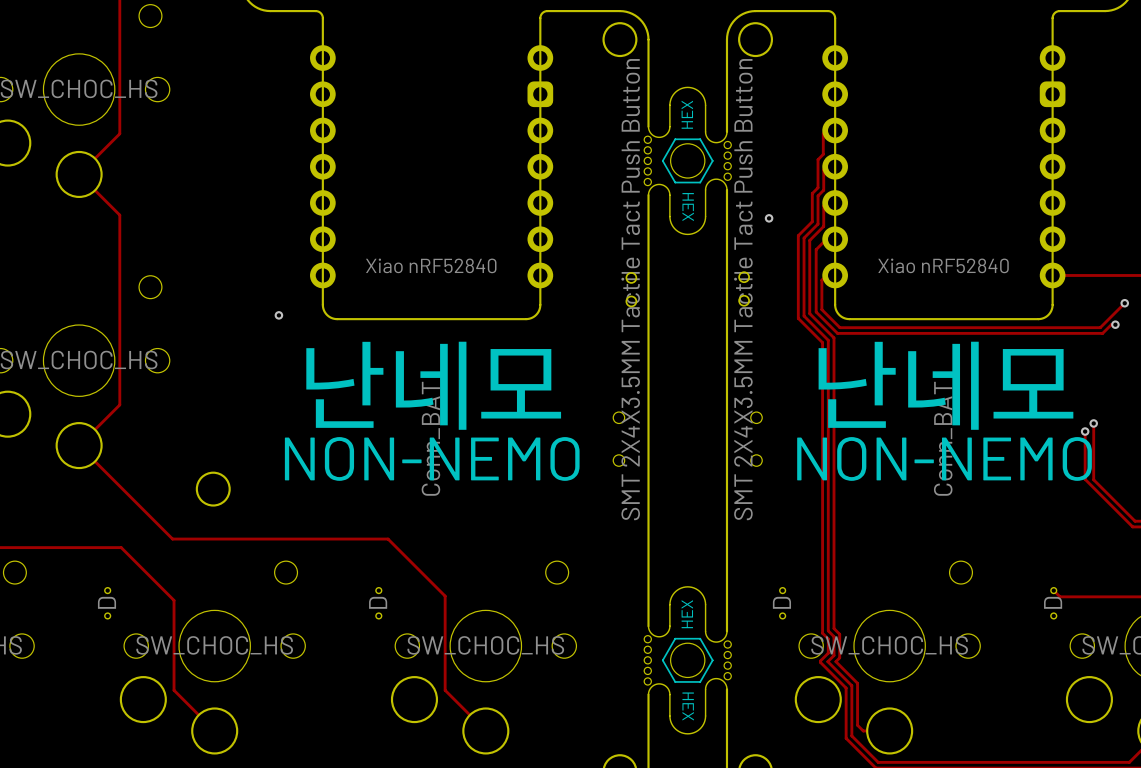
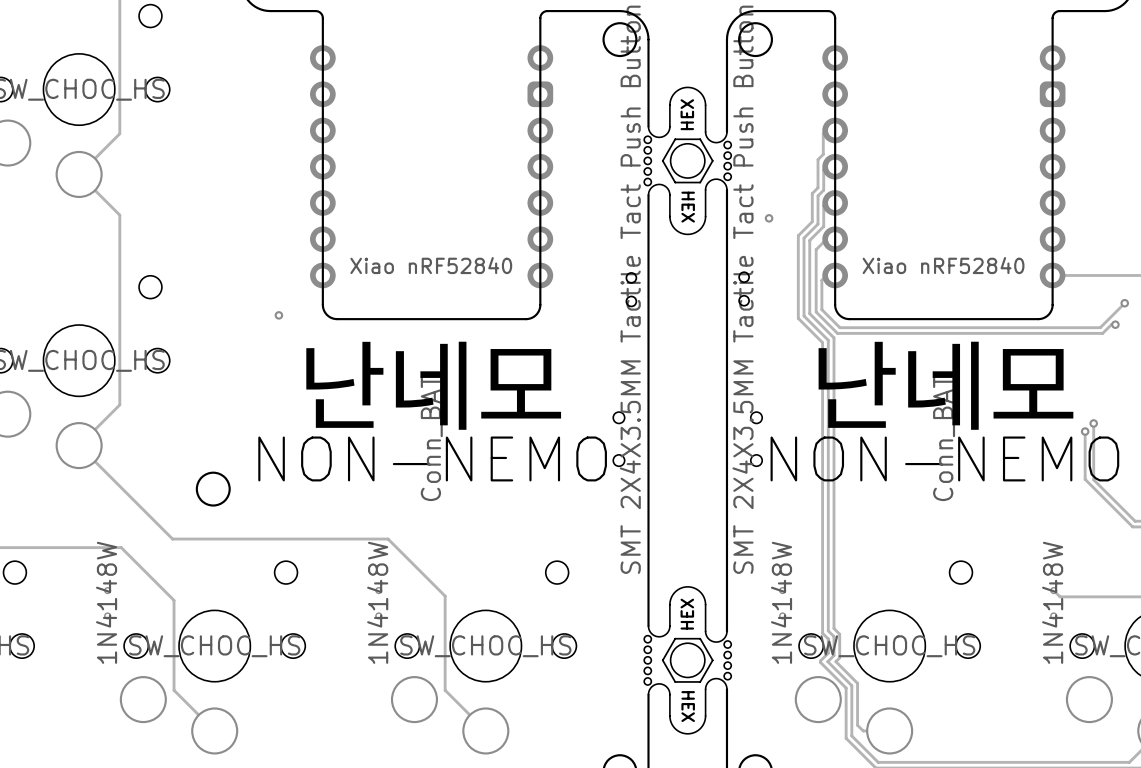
part value: D (106, 602) -> 1N4148W (106, 602)
part value: D (378, 602) -> 1N4148W (377, 602)
part value: D (781, 602) -> 1N4148W (781, 602)
part value: D (1053, 602) -> 1N4148W (1052, 602)

